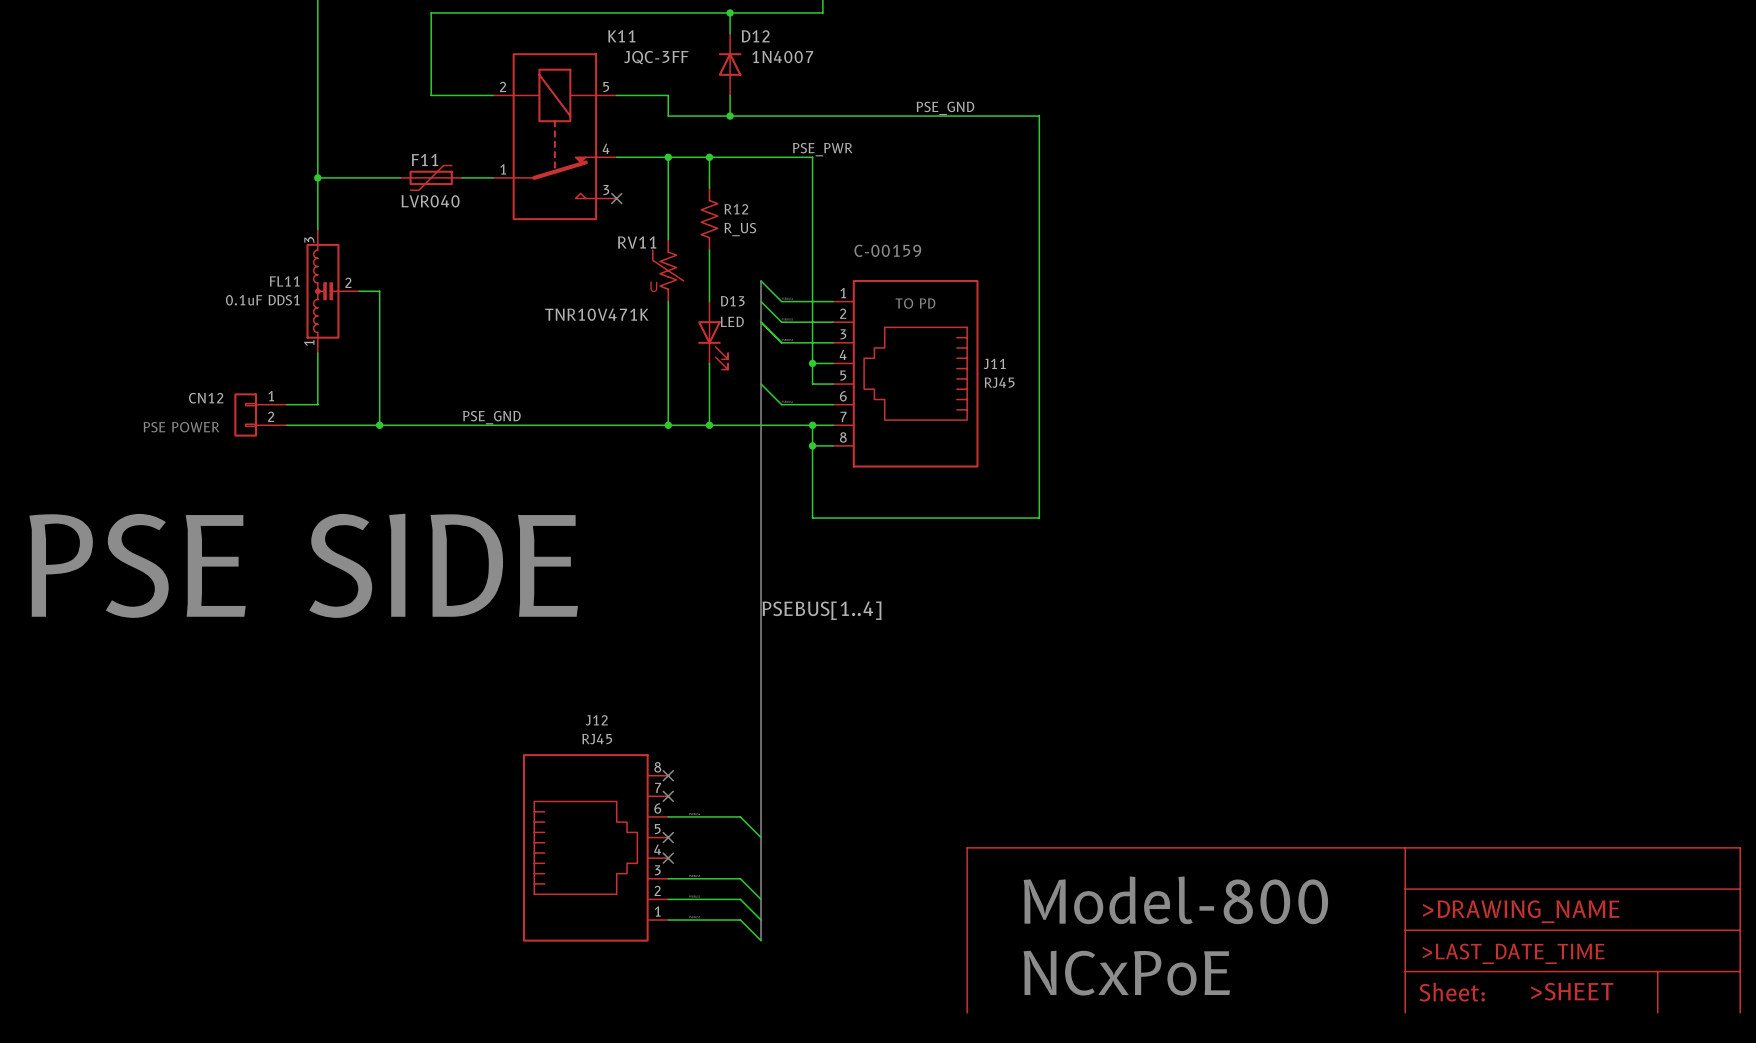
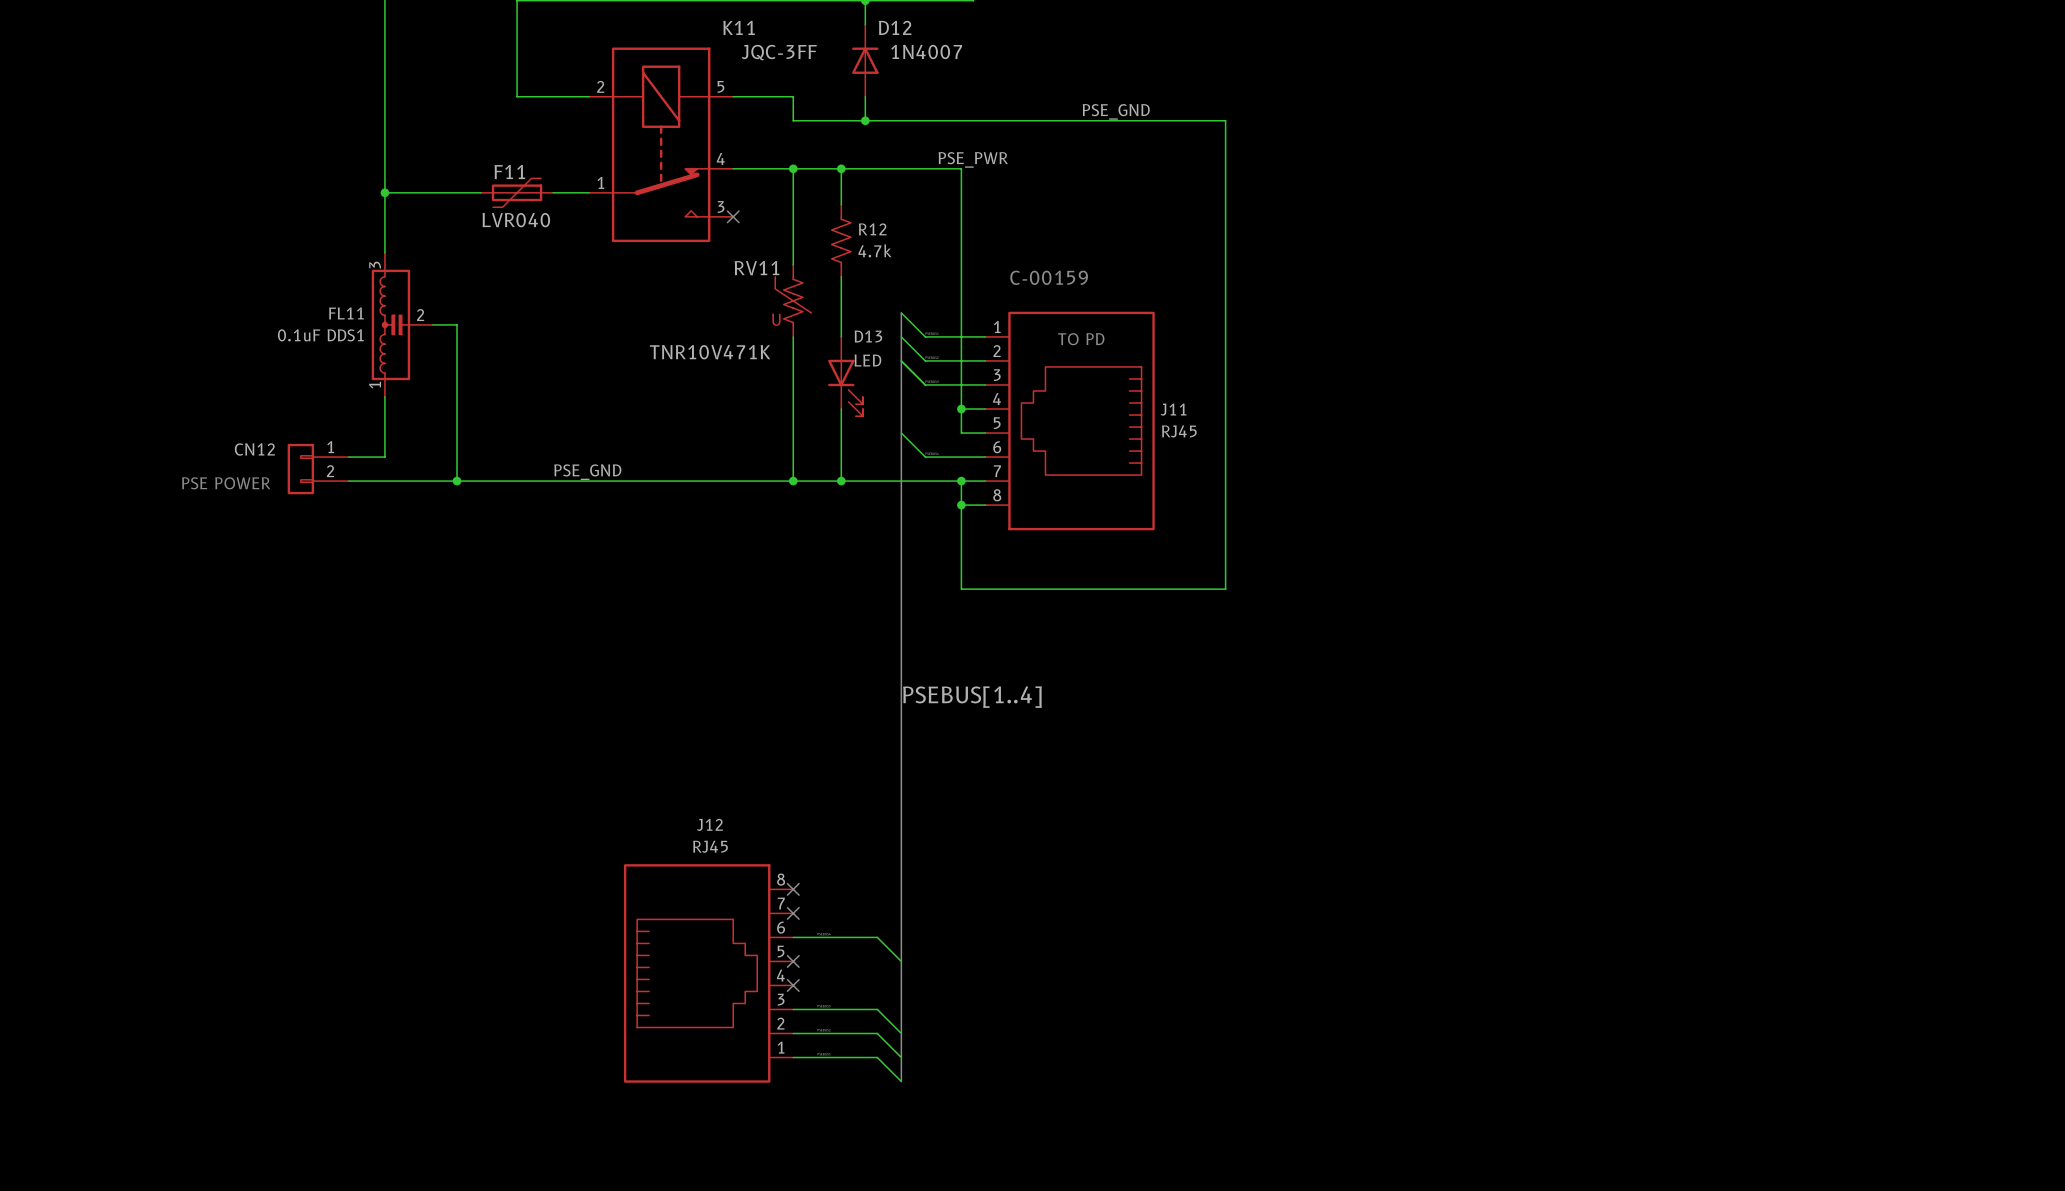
R12 value: R_US (740, 229) -> 4.7k (875, 250)
text: PSE SIDE (303, 565) -> none
text: Model-800 (1175, 900) -> none
power symbol: (1353, 930) -> none
text: NCxPoE (1126, 973) -> none

